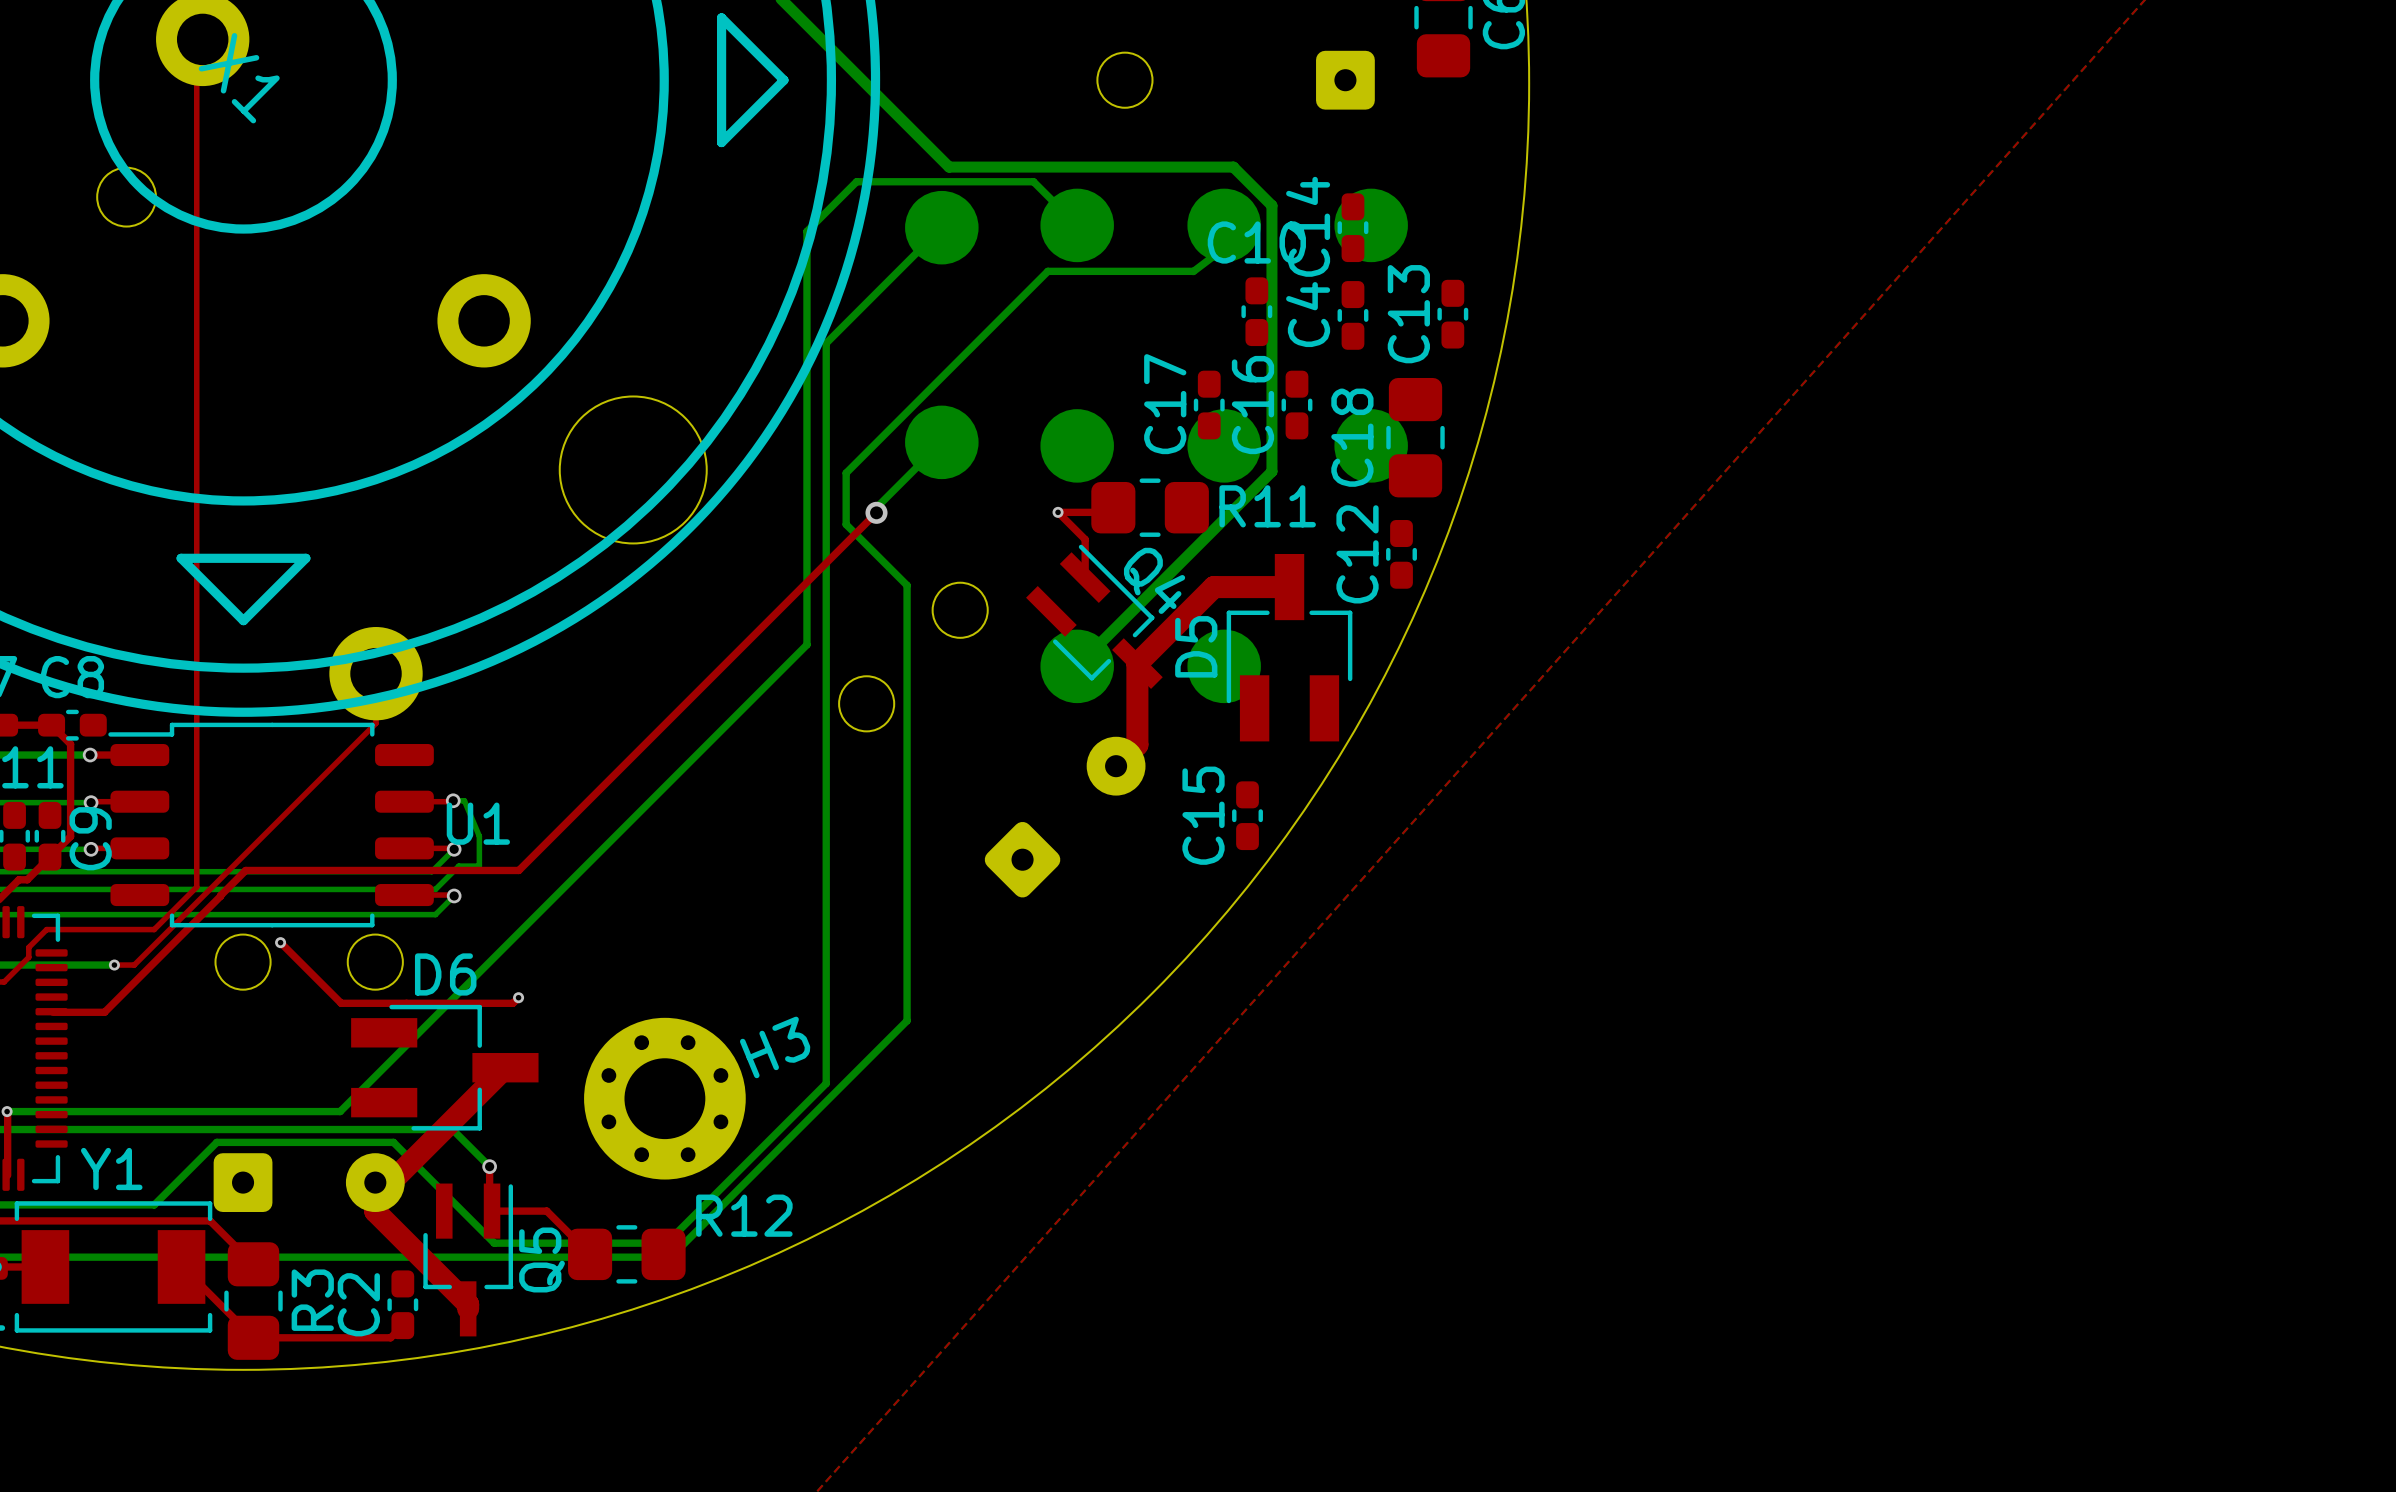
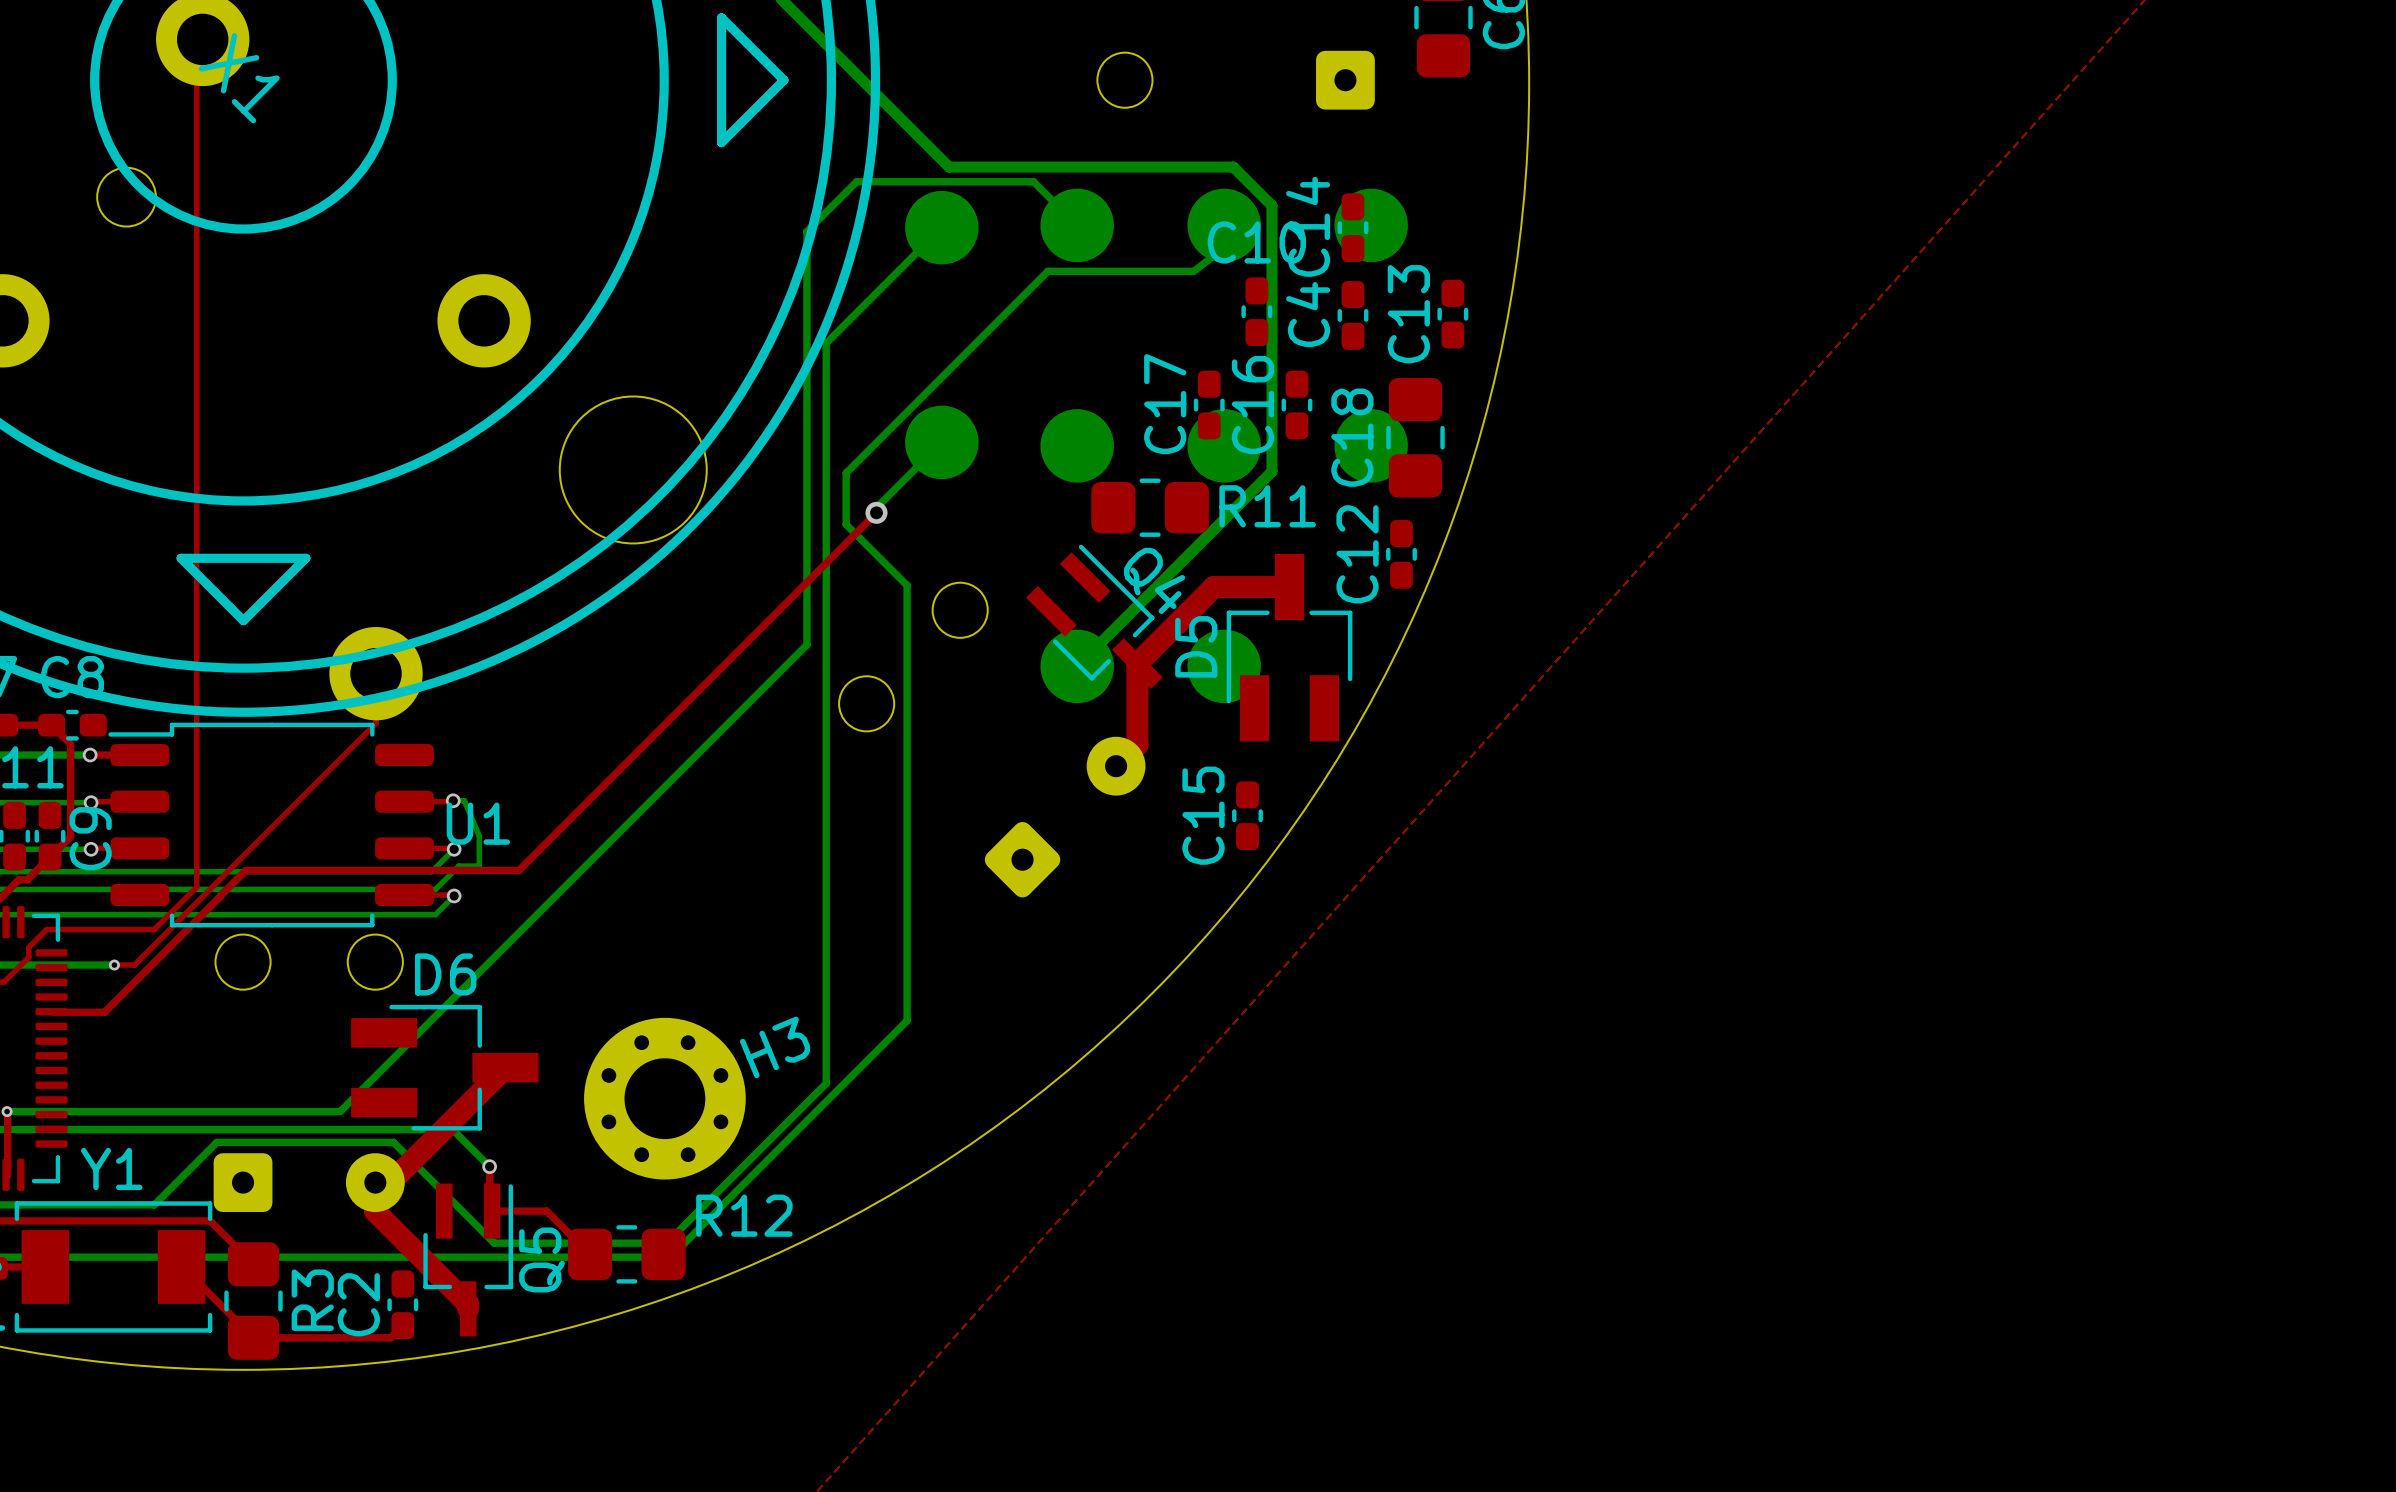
top track: (1113, 507) (1108, 512) (1058, 512) (1085, 539) (1085, 577) -> none
via: (1058, 512) -> none
top track: (280, 942) (341, 1003) (512, 1003) (518, 997) -> none
via: (280, 942) -> none
via: (518, 997) -> none

